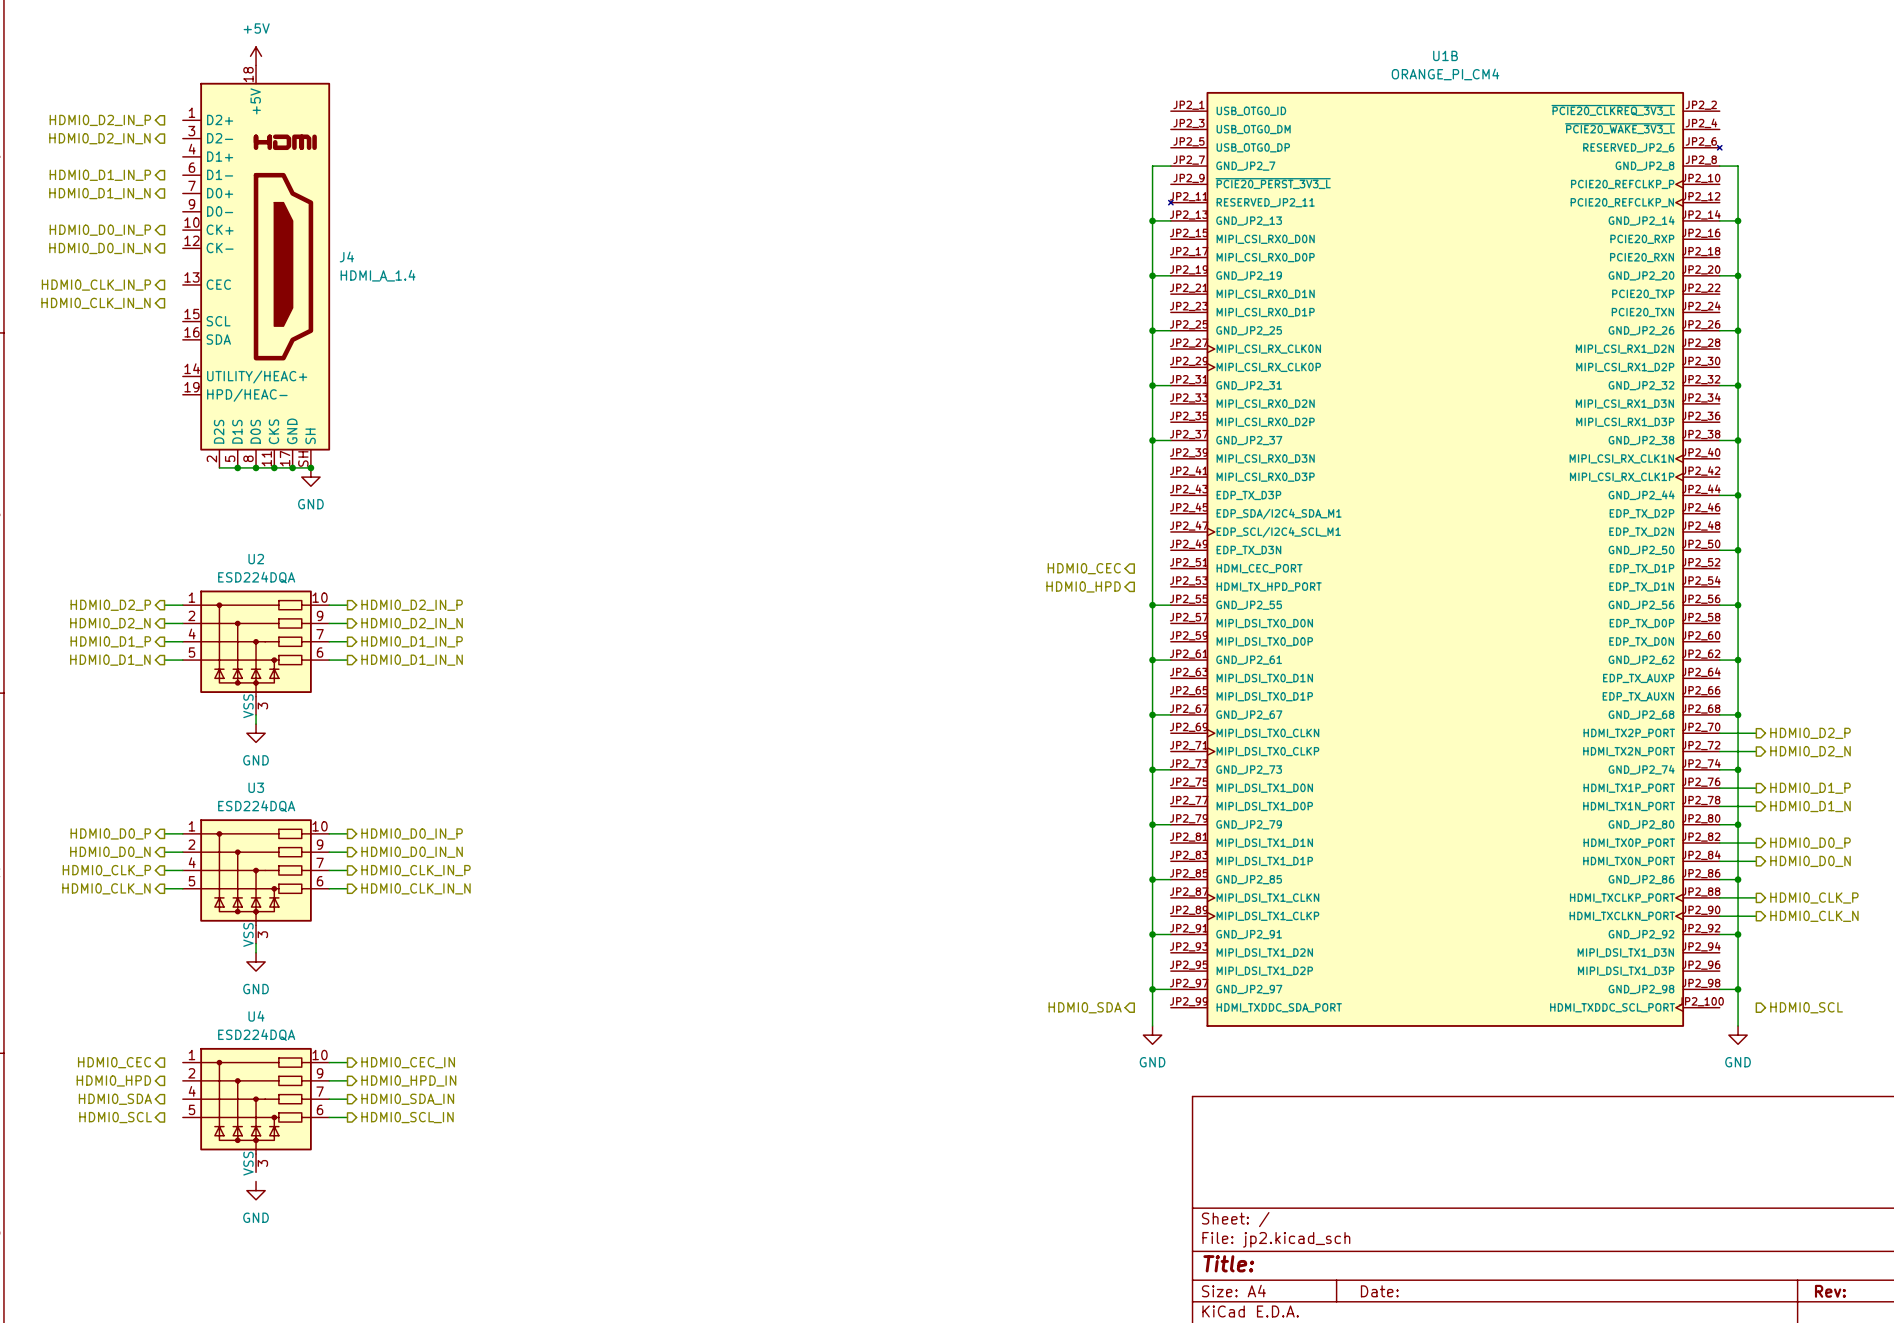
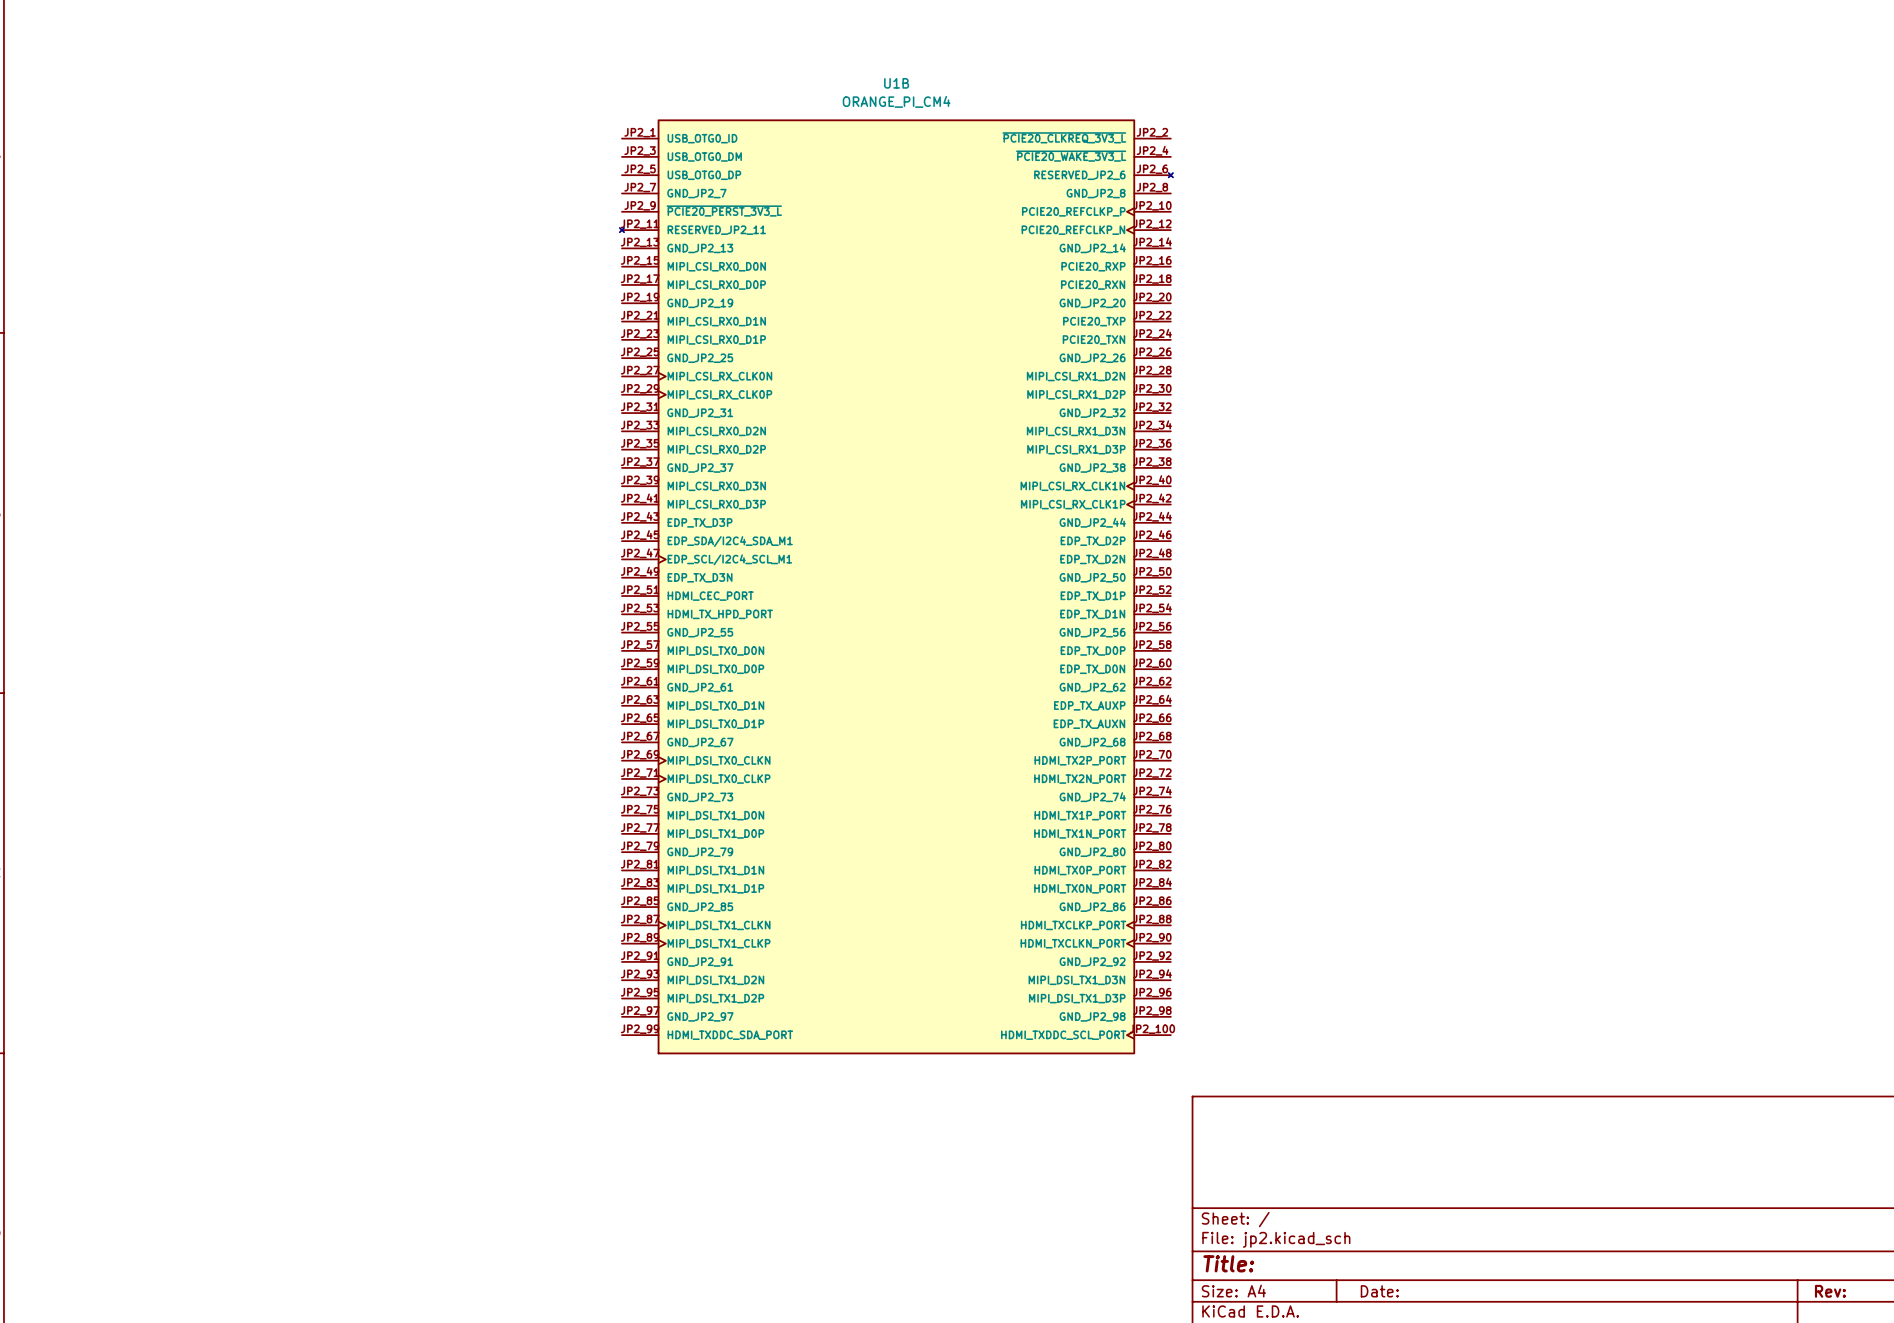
power symbol: +5V (256, 56) -> none
hierarchical label: HDMI0_D2_IN_P (100, 120) -> none
hierarchical label: HDMI0_D2_IN_N (99, 138) -> none
wire: (1170, 166) (1152, 166) (1152, 1025) -> none
wire: (1719, 166) (1738, 166) (1738, 1025) -> none
hierarchical label: HDMI0_D1_IN_P (100, 175) -> none
hierarchical label: HDMI0_D1_IN_N (99, 193) -> none
wire: (1152, 220) (1170, 220) -> none
junction: (1152, 220) -> none
wire: (1719, 220) (1738, 220) -> none
junction: (1738, 220) -> none
hierarchical label: HDMI0_D0_IN_P (100, 230) -> none
hierarchical label: HDMI0_D0_IN_N (99, 248) -> none
J4: HDMI_A_1.4 (256, 266) -> none
wire: (1152, 275) (1170, 275) -> none
junction: (1152, 275) -> none
wire: (1719, 275) (1738, 275) -> none
junction: (1738, 275) -> none
hierarchical label: HDMI0_CLK_IN_P (96, 285) -> none
hierarchical label: HDMI0_CLK_IN_N (96, 303) -> none
wire: (1152, 330) (1170, 330) -> none
junction: (1152, 330) -> none
wire: (1719, 330) (1738, 330) -> none
junction: (1738, 330) -> none
wire: (1152, 385) (1170, 385) -> none
junction: (1152, 385) -> none
wire: (1719, 385) (1738, 385) -> none
junction: (1738, 385) -> none
wire: (1152, 440) (1170, 440) -> none
junction: (1152, 440) -> none
wire: (1719, 440) (1738, 440) -> none
junction: (1738, 440) -> none
wire: (219, 467) (310, 467) -> none
junction: (237, 467) -> none
junction: (256, 467) -> none
junction: (274, 467) -> none
junction: (292, 467) -> none
junction: (310, 467) -> none
power symbol: GND (310, 477) -> none
wire: (1719, 495) (1738, 495) -> none
junction: (1738, 495) -> none
wire: (1719, 550) (1738, 550) -> none
junction: (1738, 550) -> none
U1B position: (1445, 559) -> (896, 586)
hierarchical label: HDMI0_CEC (1084, 568) -> none
hierarchical label: HDMI0_HPD (1083, 586) -> none
hierarchical label: HDMI0_D2_P (110, 605) -> none
wire: (164, 605) (182, 605) -> none
wire: (329, 605) (347, 605) -> none
hierarchical label: HDMI0_D2_IN_P (412, 605) -> none
wire: (1152, 605) (1170, 605) -> none
junction: (1152, 605) -> none
wire: (1719, 605) (1738, 605) -> none
junction: (1738, 605) -> none
hierarchical label: HDMI0_D2_N (110, 623) -> none
wire: (164, 623) (182, 623) -> none
wire: (329, 623) (347, 623) -> none
hierarchical label: HDMI0_D2_IN_N (412, 623) -> none
hierarchical label: HDMI0_D1_P (110, 641) -> none
wire: (164, 641) (182, 641) -> none
wire: (329, 641) (347, 641) -> none
hierarchical label: HDMI0_D1_IN_P (412, 641) -> none
U2: ESD224DQA (256, 652) -> none
hierarchical label: HDMI0_D1_N (110, 660) -> none
wire: (164, 660) (182, 660) -> none
wire: (329, 660) (347, 660) -> none
hierarchical label: HDMI0_D1_IN_N (412, 660) -> none
wire: (1152, 660) (1170, 660) -> none
junction: (1152, 660) -> none
wire: (1719, 660) (1738, 660) -> none
junction: (1738, 660) -> none
wire: (256, 714) (256, 724) -> none
wire: (1152, 714) (1170, 714) -> none
junction: (1152, 714) -> none
wire: (1719, 714) (1738, 714) -> none
junction: (1738, 714) -> none
power symbol: GND (256, 733) -> none
wire: (1719, 733) (1756, 733) -> none
hierarchical label: HDMI0_D2_P (1810, 733) -> none
wire: (1719, 751) (1756, 751) -> none
hierarchical label: HDMI0_D2_N (1810, 751) -> none
wire: (1152, 769) (1170, 769) -> none
junction: (1152, 769) -> none
wire: (1719, 769) (1738, 769) -> none
junction: (1738, 769) -> none
wire: (1719, 788) (1756, 788) -> none
hierarchical label: HDMI0_D1_P (1810, 788) -> none
wire: (1719, 806) (1756, 806) -> none
hierarchical label: HDMI0_D1_N (1810, 806) -> none
wire: (1152, 824) (1170, 824) -> none
junction: (1152, 824) -> none
wire: (1719, 824) (1738, 824) -> none
junction: (1738, 824) -> none
hierarchical label: HDMI0_D0_P (110, 833) -> none
wire: (164, 833) (182, 833) -> none
wire: (329, 833) (347, 833) -> none
hierarchical label: HDMI0_D0_IN_P (412, 833) -> none
wire: (1719, 843) (1756, 843) -> none
hierarchical label: HDMI0_D0_P (1810, 843) -> none
hierarchical label: HDMI0_D0_N (110, 852) -> none
wire: (164, 852) (182, 852) -> none
wire: (329, 852) (347, 852) -> none
hierarchical label: HDMI0_D0_IN_N (412, 852) -> none
wire: (1719, 861) (1756, 861) -> none
hierarchical label: HDMI0_D0_N (1810, 861) -> none
hierarchical label: HDMI0_CLK_P (106, 870) -> none
wire: (164, 870) (182, 870) -> none
wire: (329, 870) (347, 870) -> none
hierarchical label: HDMI0_CLK_IN_P (416, 870) -> none
wire: (1152, 879) (1170, 879) -> none
junction: (1152, 879) -> none
wire: (1719, 879) (1738, 879) -> none
junction: (1738, 879) -> none
U3: ESD224DQA (256, 881) -> none
hierarchical label: HDMI0_CLK_N (106, 888) -> none
wire: (164, 888) (182, 888) -> none
wire: (329, 888) (347, 888) -> none
hierarchical label: HDMI0_CLK_IN_N (416, 888) -> none
wire: (1719, 897) (1756, 897) -> none
hierarchical label: HDMI0_CLK_P (1814, 898) -> none
wire: (1719, 916) (1756, 916) -> none
hierarchical label: HDMI0_CLK_N (1814, 916) -> none
wire: (1152, 934) (1170, 934) -> none
junction: (1152, 934) -> none
wire: (1719, 934) (1738, 934) -> none
junction: (1738, 934) -> none
wire: (256, 943) (256, 952) -> none
power symbol: GND (256, 961) -> none
wire: (1152, 989) (1170, 989) -> none
junction: (1152, 989) -> none
wire: (1719, 989) (1738, 989) -> none
junction: (1738, 989) -> none
hierarchical label: HDMI0_SDA (1085, 1007) -> none
hierarchical label: HDMI0_SCL (1806, 1007) -> none
power symbol: GND (1152, 1035) -> none
power symbol: GND (1738, 1035) -> none
hierarchical label: HDMI0_CEC (114, 1062) -> none
wire: (329, 1062) (347, 1062) -> none
hierarchical label: HDMI0_CEC_IN (408, 1062) -> none
hierarchical label: HDMI0_HPD (113, 1080) -> none
wire: (329, 1080) (347, 1080) -> none
hierarchical label: HDMI0_HPD_IN (408, 1080) -> none
hierarchical label: HDMI0_SDA (115, 1099) -> none
wire: (329, 1099) (347, 1099) -> none
hierarchical label: HDMI0_SDA_IN (407, 1099) -> none
U4: ESD224DQA (256, 1110) -> none
hierarchical label: HDMI0_SCL (115, 1117) -> none
wire: (329, 1117) (347, 1117) -> none
hierarchical label: HDMI0_SCL_IN (407, 1117) -> none
power symbol: GND (256, 1190) -> none

